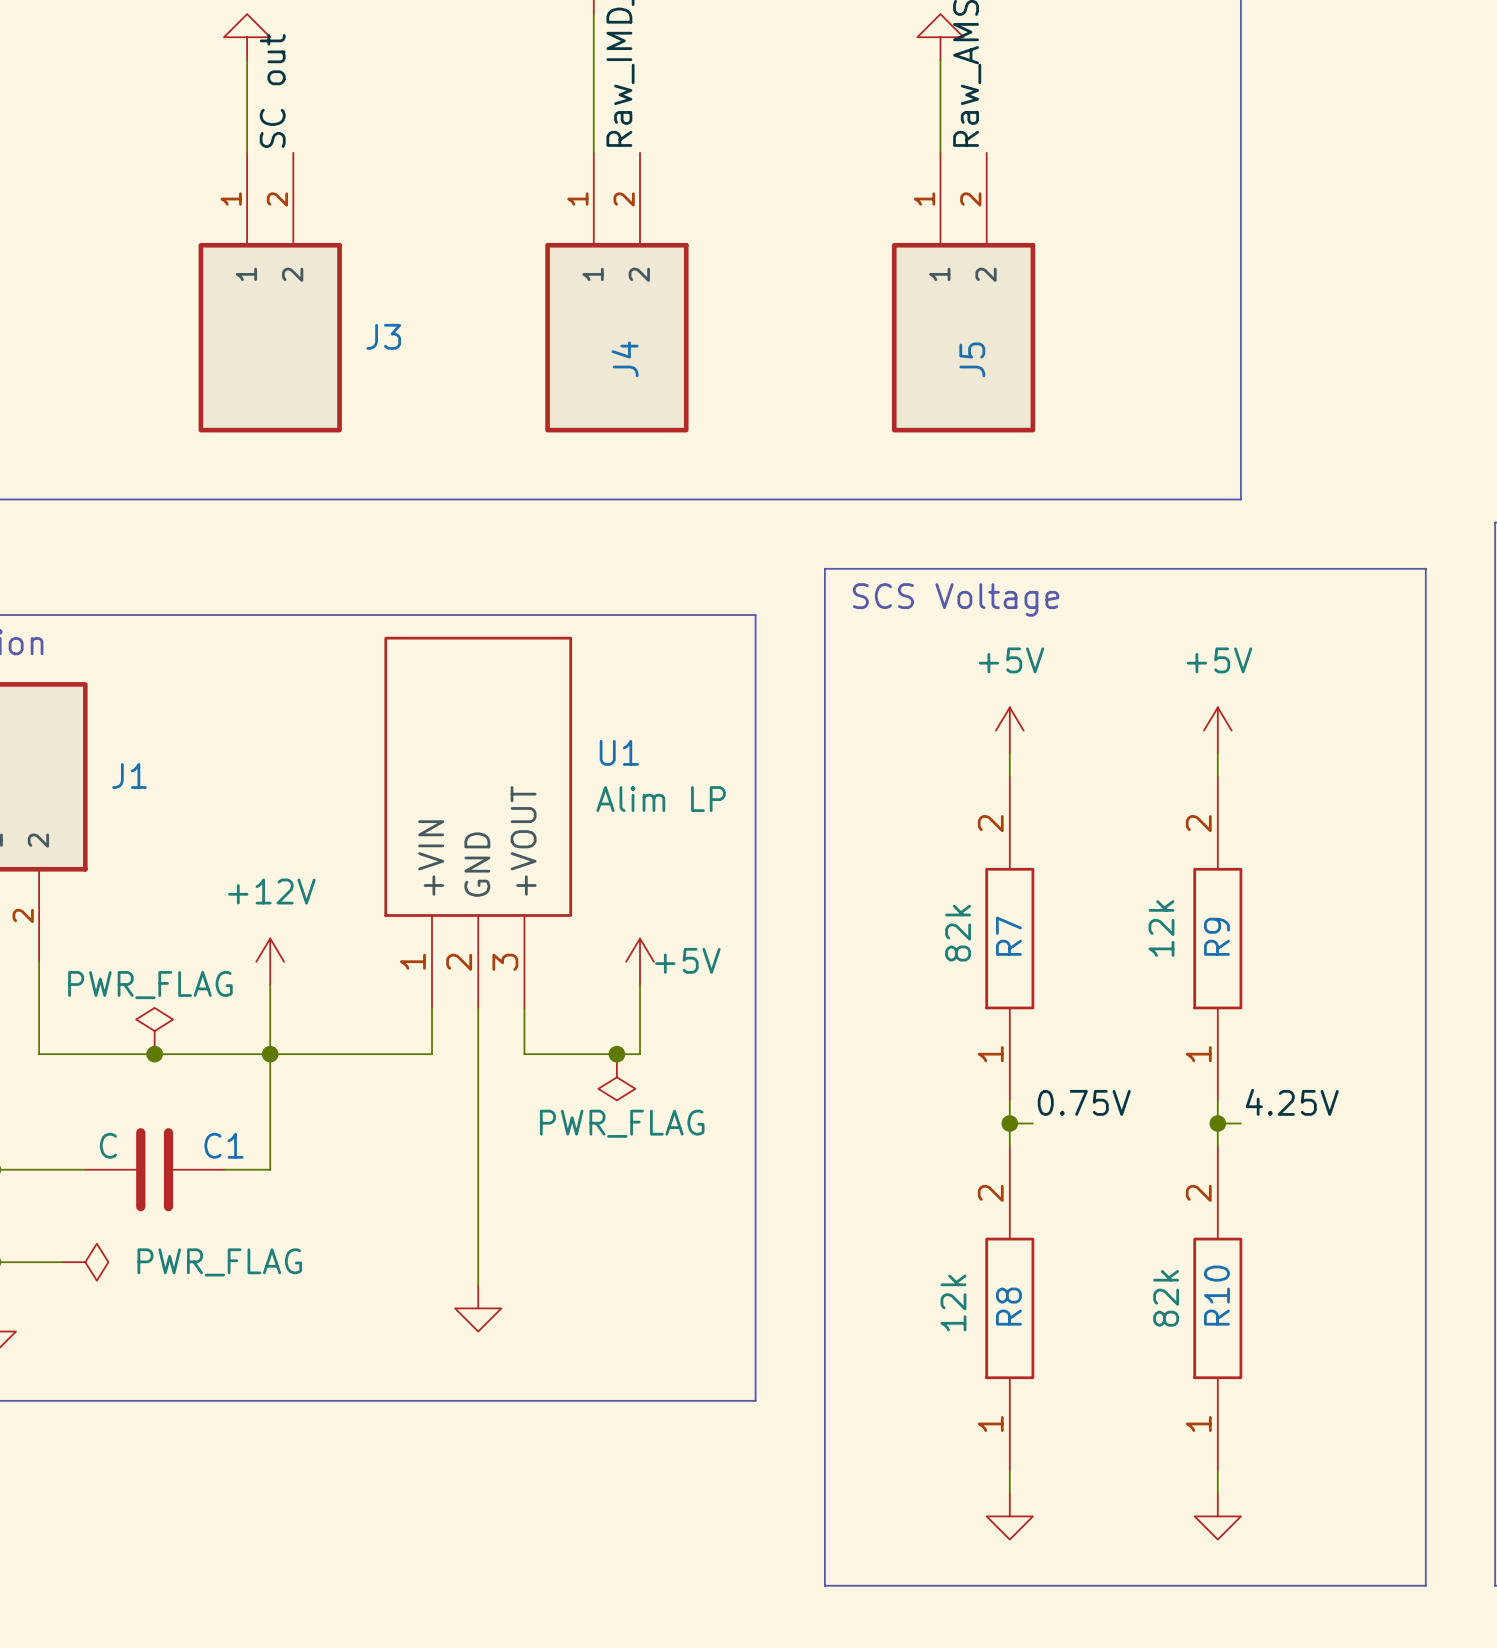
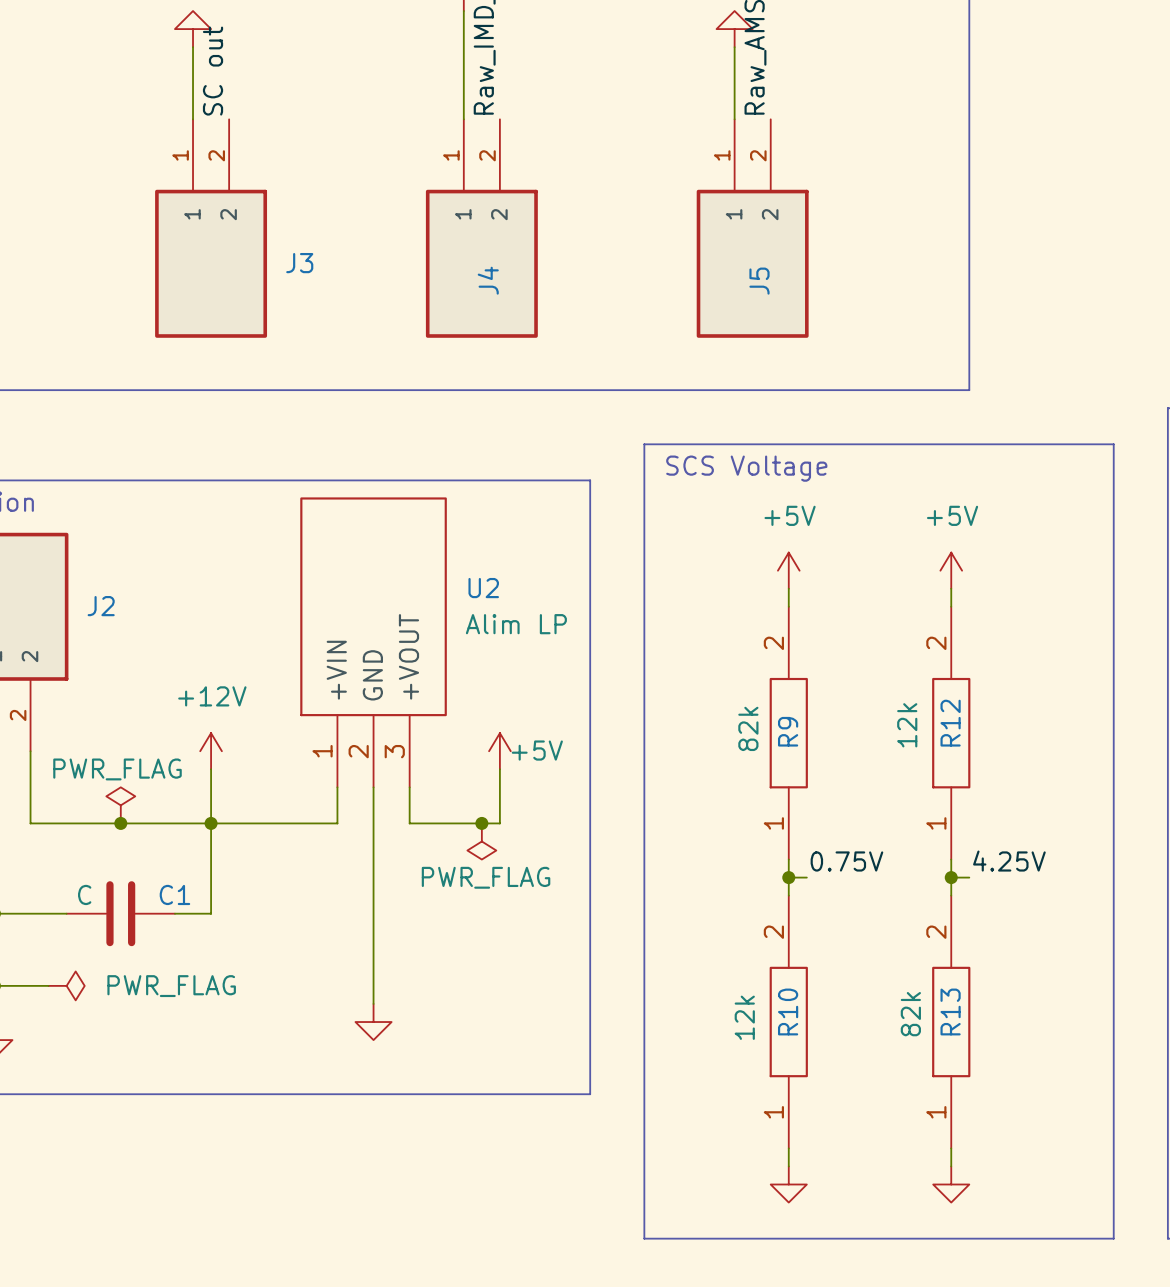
U1 name: U1 (619, 752) -> U2 (483, 588)
J1 name: J1 (129, 775) -> J2 (101, 606)
R7 name: R7 (1008, 936) -> R9 (788, 731)
R9 name: R9 (1216, 936) -> R12 (950, 723)
R10 name: R10 (1216, 1295) -> R13 (950, 1011)
R8 name: R8 (1008, 1306) -> R10 (788, 1011)

